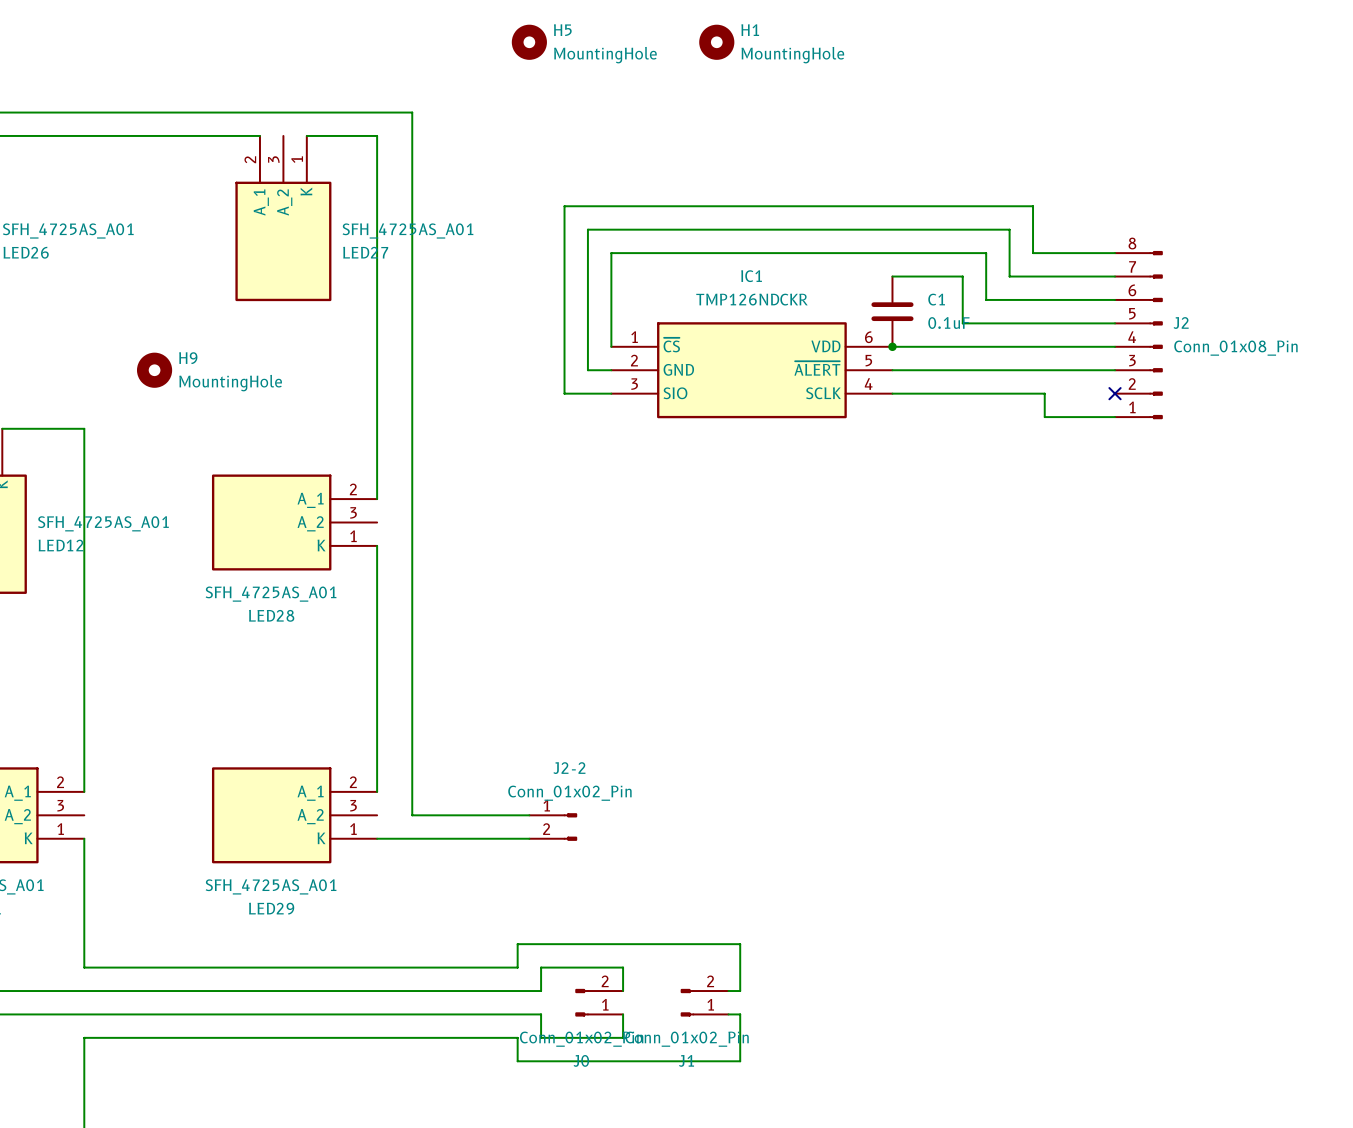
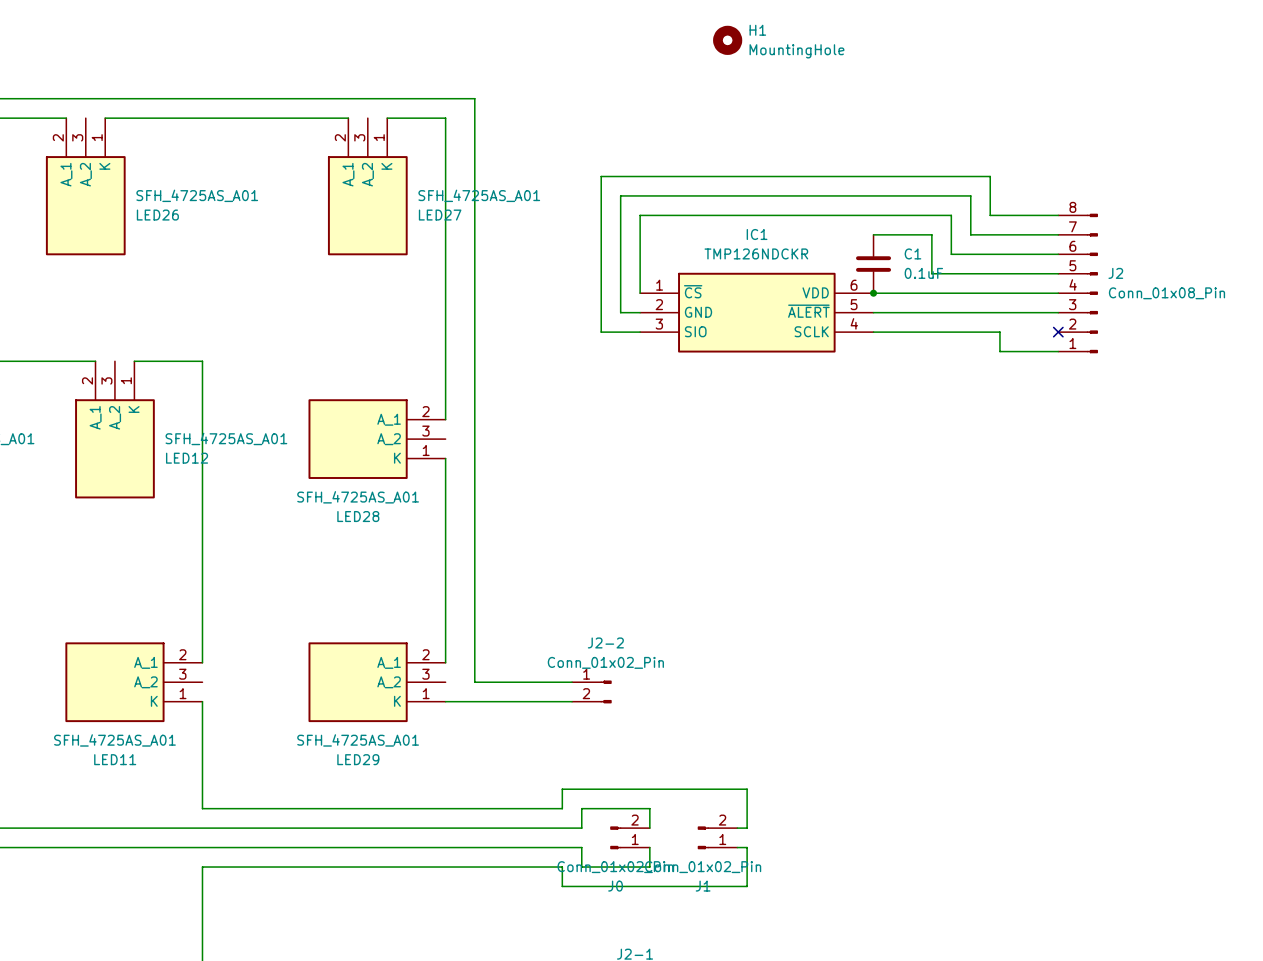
H5: MountingHole (529, 42) -> none
H9: MountingHole (154, 370) -> none

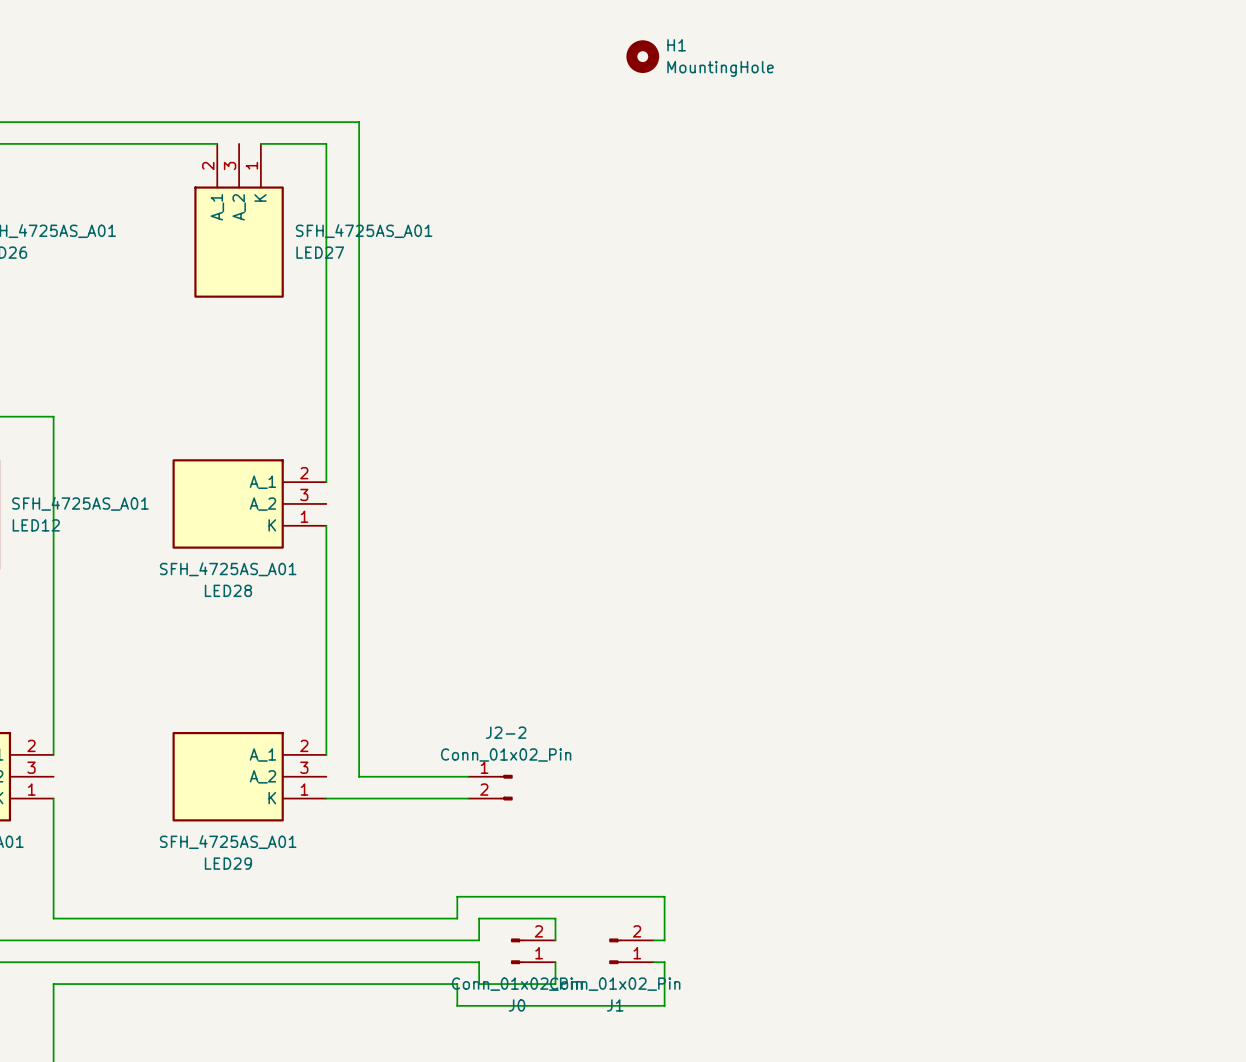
wire: (1058, 215) (990, 215) (990, 176) (601, 176) (601, 332) (640, 332) -> none
wire: (873, 234) (931, 234) (931, 273) (1058, 273) -> none
wire: (1058, 234) (970, 234) (970, 195) (620, 195) (620, 312) (640, 312) -> none
wire: (1058, 254) (951, 254) (951, 215) (640, 215) (640, 293) -> none
C1: 0.1uF (873, 264) -> none
J2: Conn_01x08_Pin (1078, 283) -> none
wire: (873, 293) (1058, 293) -> none
junction: (873, 293) -> none
IC1: TMP126NDCKR (756, 312) -> none
wire: (873, 312) (1058, 312) -> none
wire: (873, 332) (999, 332) (999, 351) (1058, 351) -> none
no-connect mark: (1058, 332) -> none

